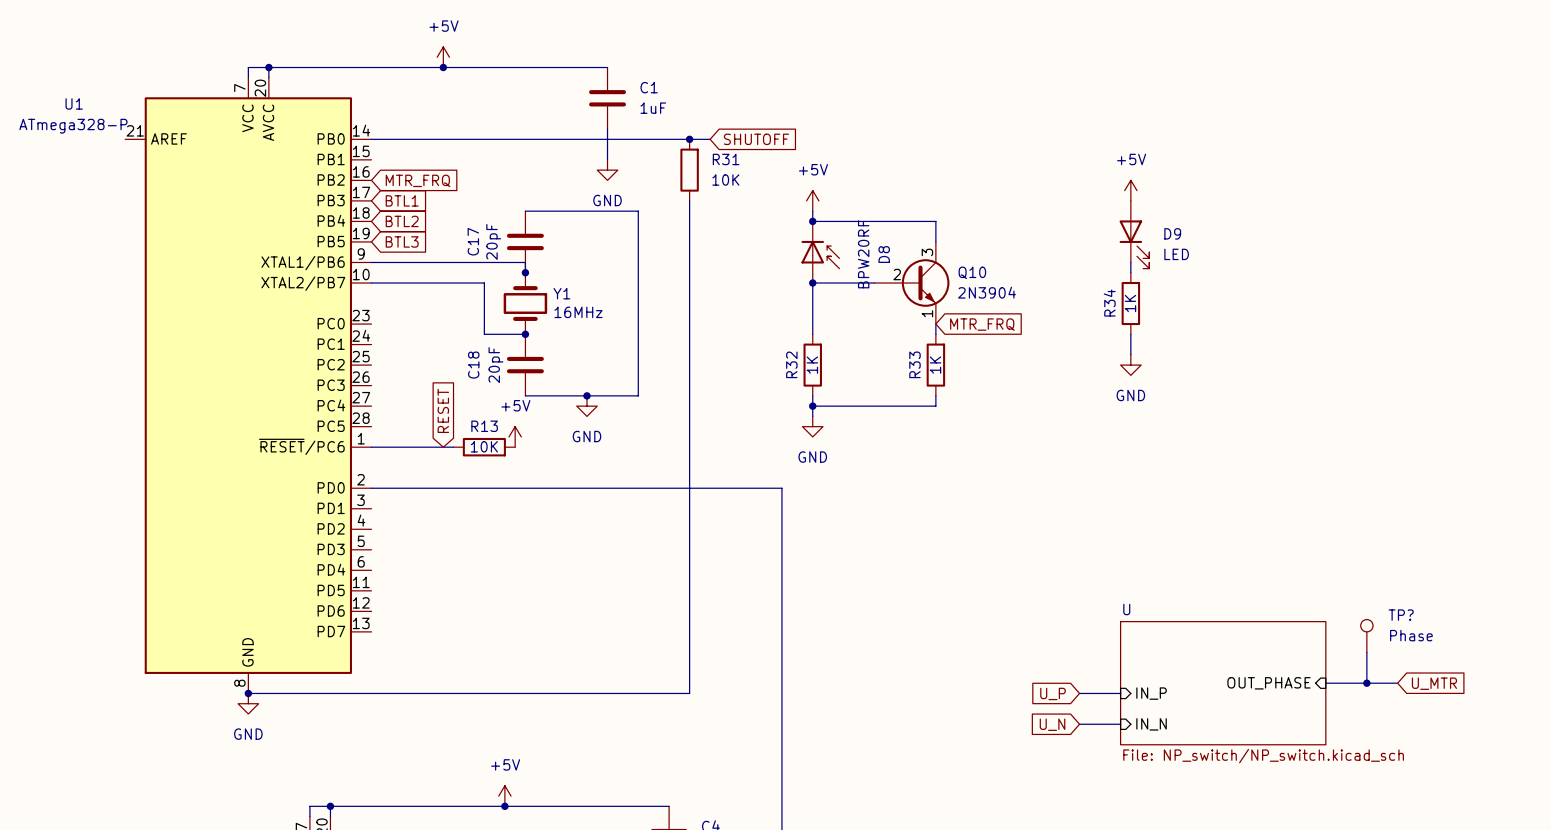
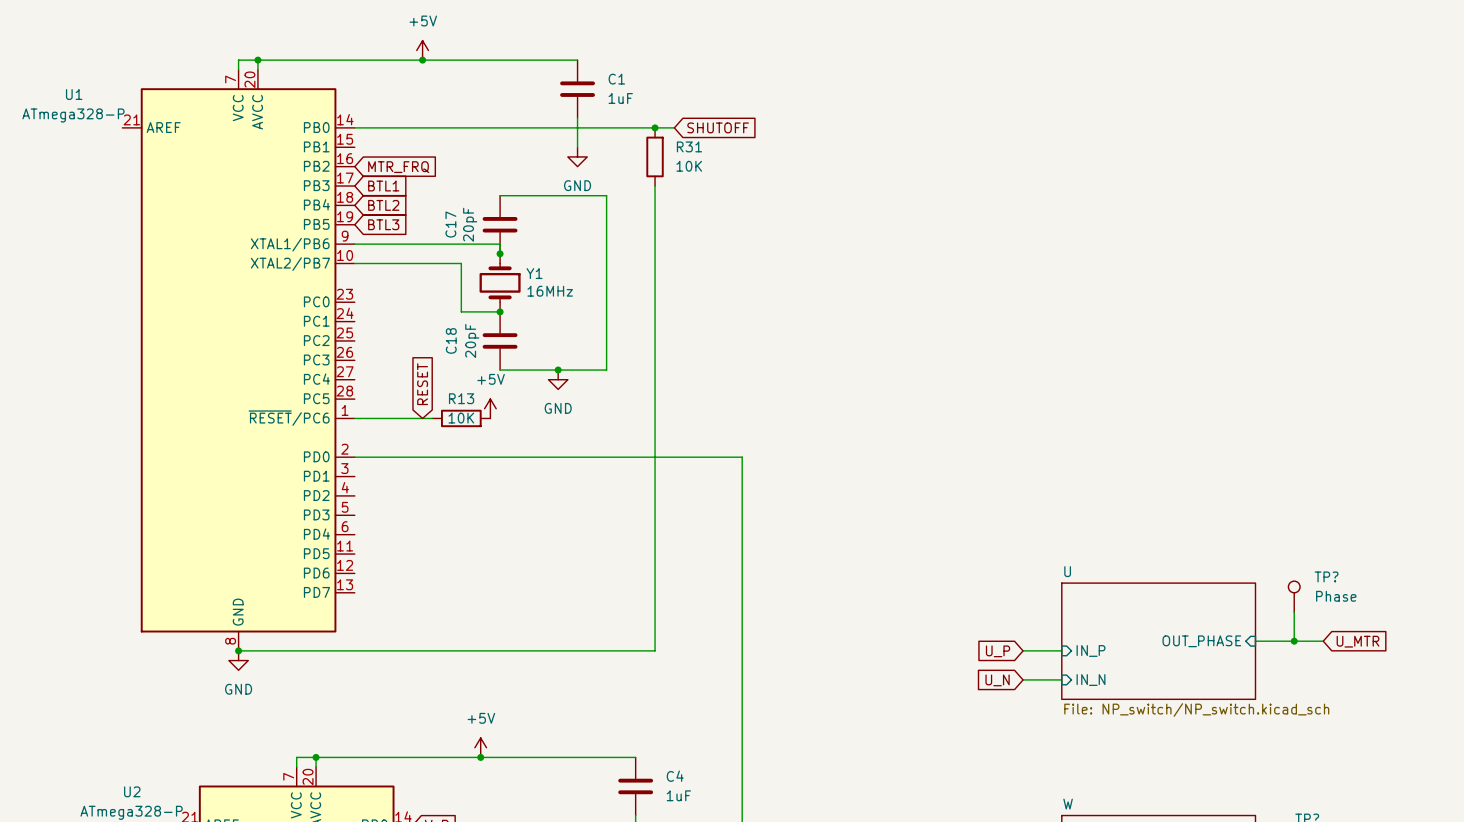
power symbol: +5V (1130, 190) -> none
power symbol: +5V (812, 200) -> none
wire: (812, 211) (812, 221) (935, 221) (935, 241) -> none
junction: (812, 221) -> none
D9: LED (1134, 234) -> none
D8: BPW20RF (820, 252) -> none
wire: (1130, 262) (1130, 272) -> none
junction: (812, 283) -> none
wire: (874, 283) (812, 283) (812, 334) -> none
Q10: 2N3904 (911, 283) -> none
R34: 1K (1130, 303) -> none
wire: (935, 324) (935, 334) -> none
global label: MTR_FRQ (982, 324) -> none
wire: (1130, 334) (1130, 354) -> none
R32: 1K (812, 365) -> none
R33: 1K (935, 365) -> none
power symbol: GND (1130, 365) -> none
wire: (812, 395) (812, 416) -> none
wire: (935, 395) (935, 406) (812, 406) -> none
junction: (812, 406) -> none
power symbol: GND (812, 426) -> none

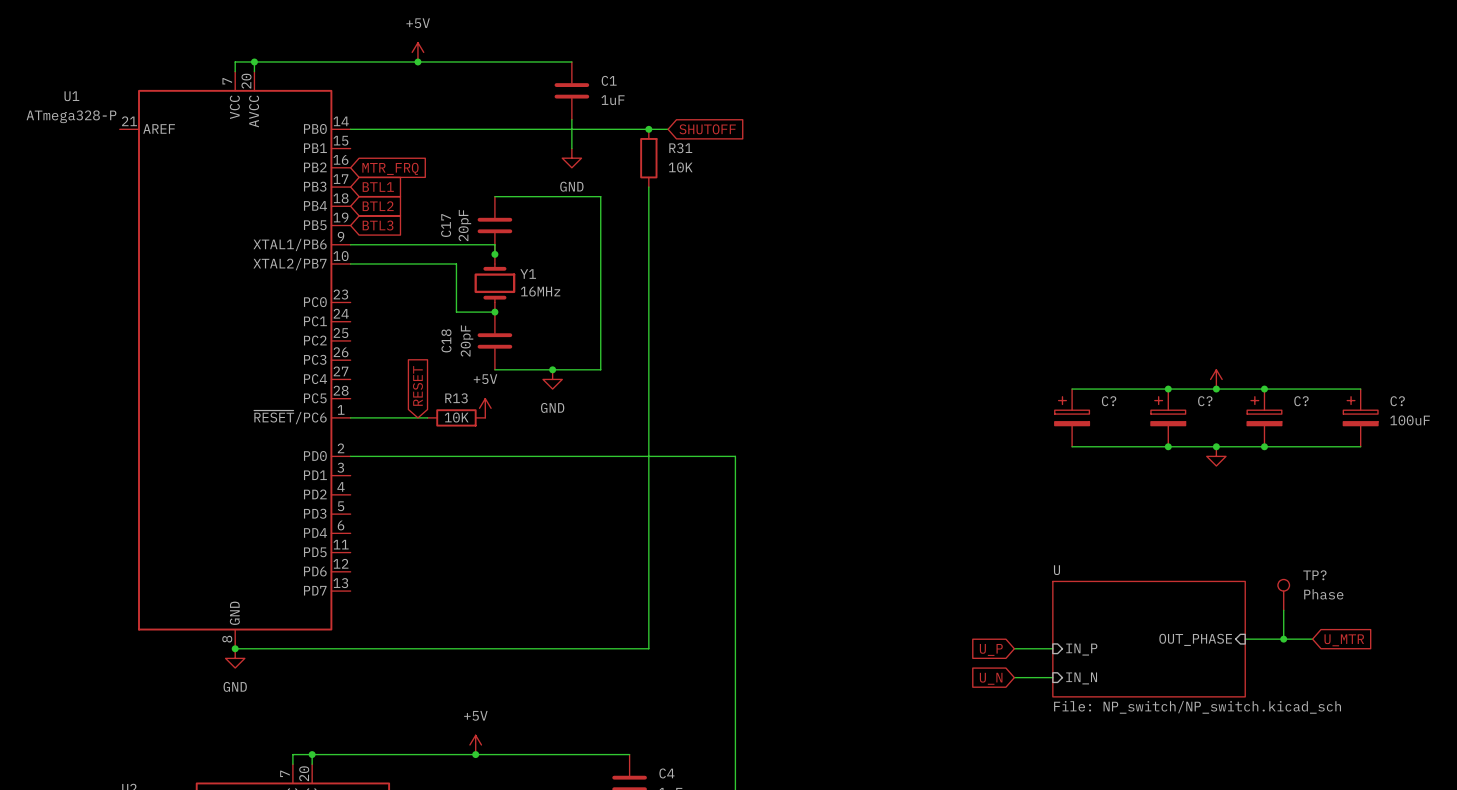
power symbol: none -> (1216, 379)
wire: none -> (1072, 389) (1360, 389)
junction: none -> (1168, 389)
junction: none -> (1216, 389)
junction: none -> (1264, 389)
C?: none -> (1072, 417)
C?: none -> (1168, 417)
C?: none -> (1264, 417)
C?: none -> 100uF (1360, 417)
wire: none -> (1072, 446) (1360, 446)
junction: none -> (1168, 446)
junction: none -> (1216, 446)
junction: none -> (1264, 446)
power symbol: none -> (1216, 456)

